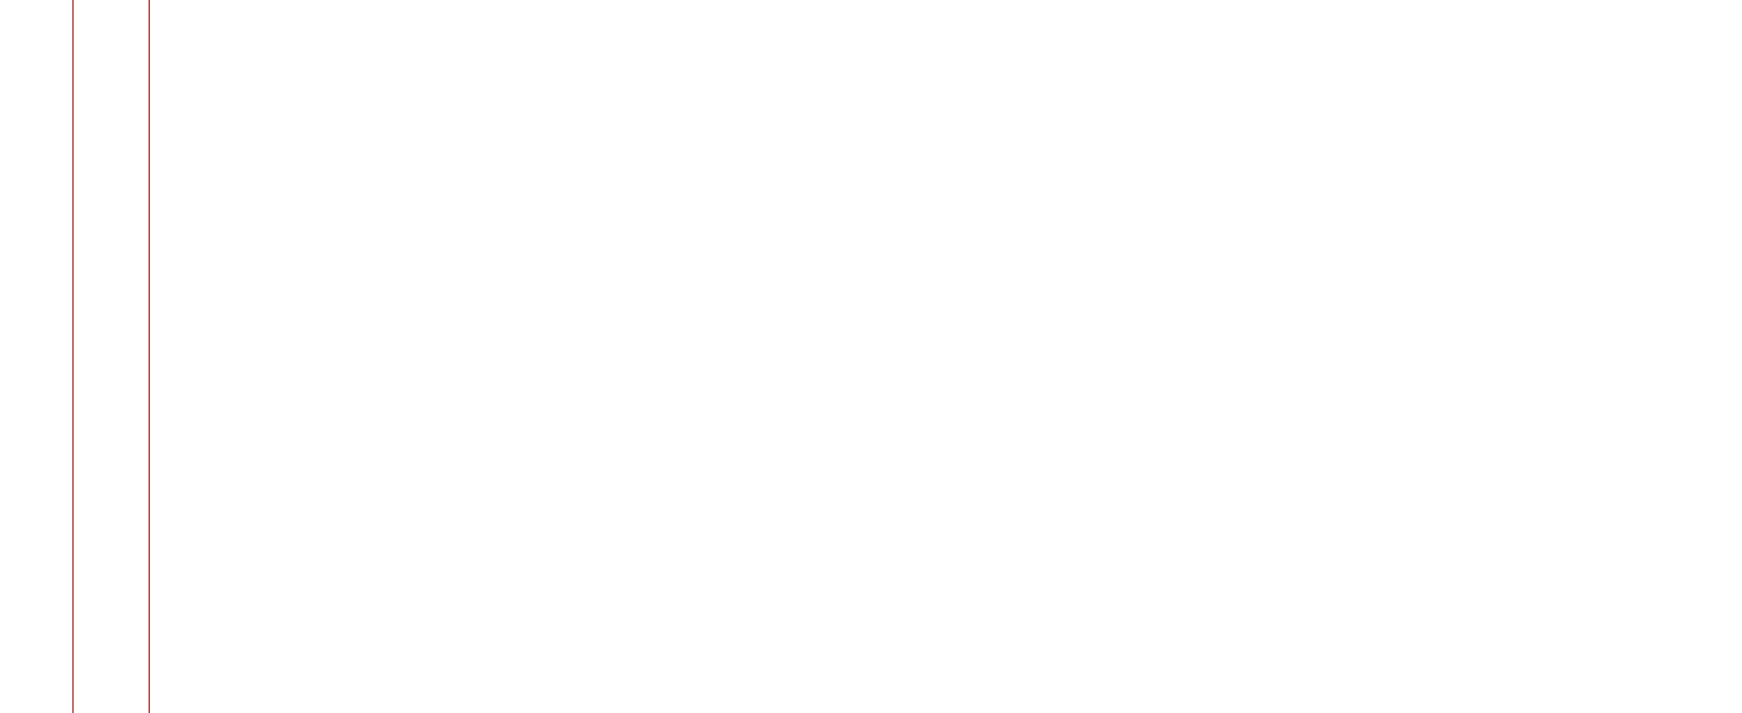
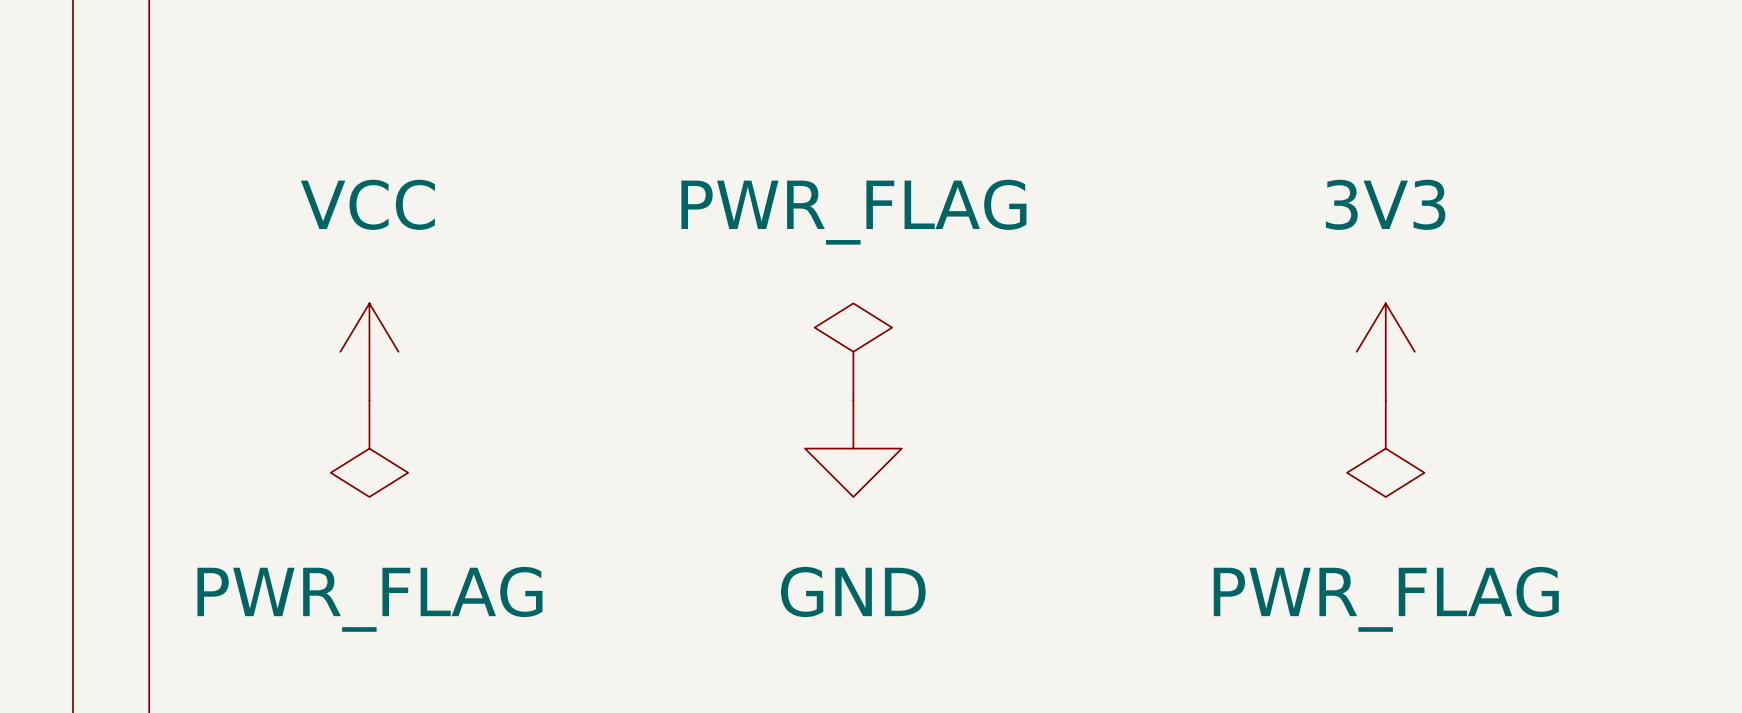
power symbol: none -> VCC (369, 351)
power symbol: none -> PWR_FLAG (853, 351)
power symbol: none -> 3V3 (1385, 351)
power symbol: none -> PWR_FLAG (369, 448)
power symbol: none -> GND (853, 448)
power symbol: none -> PWR_FLAG (1385, 448)

